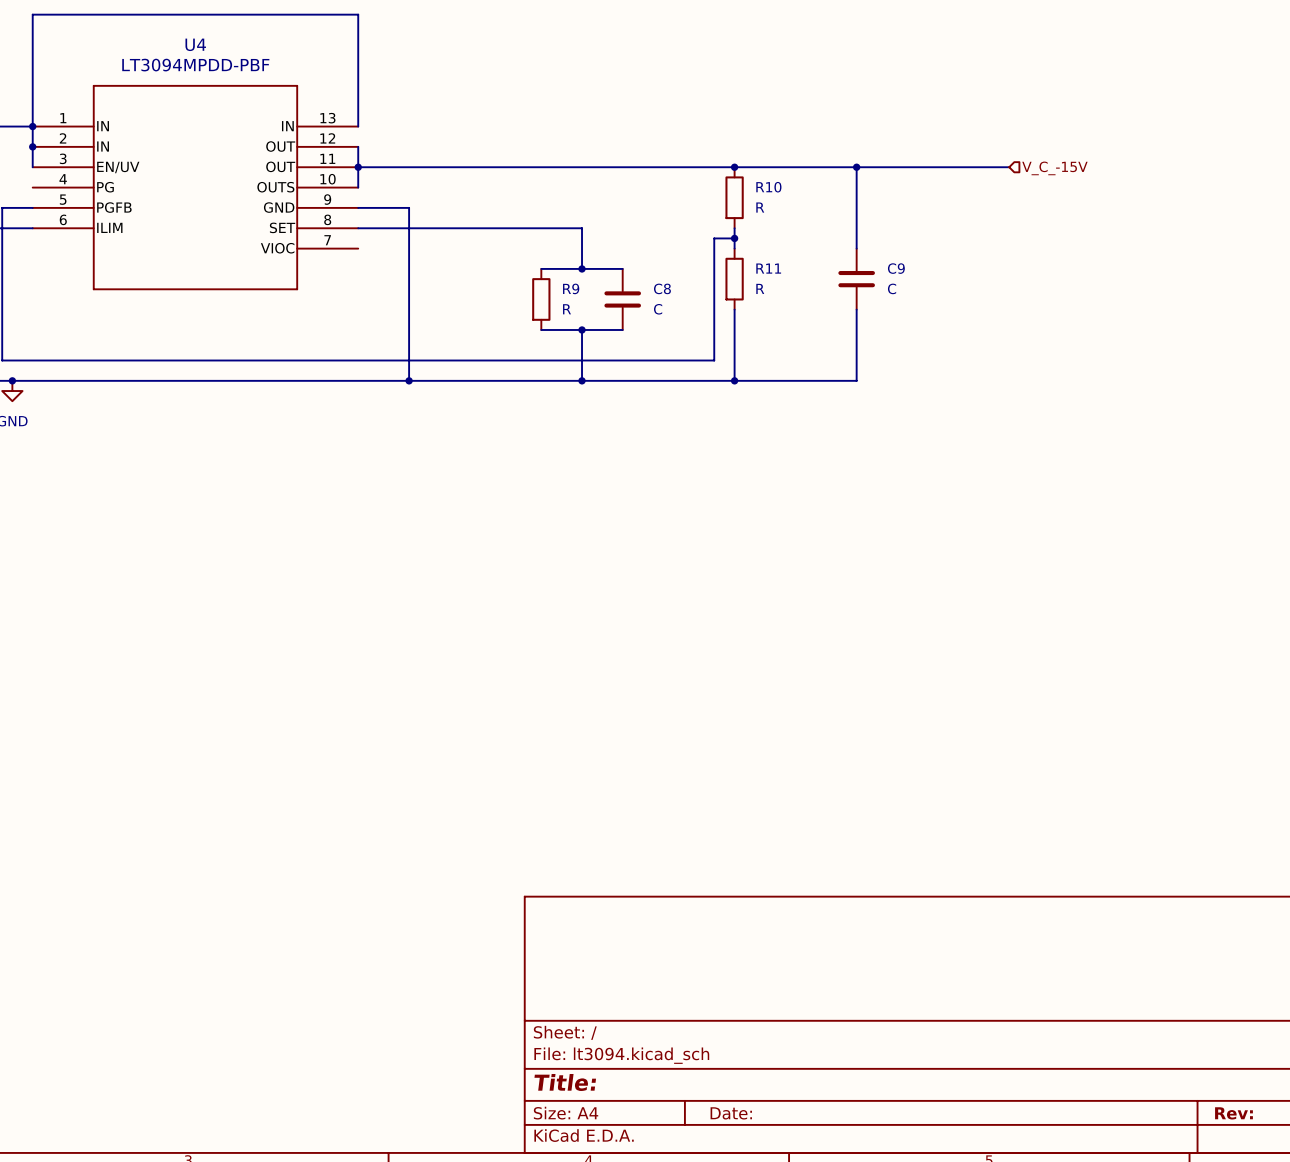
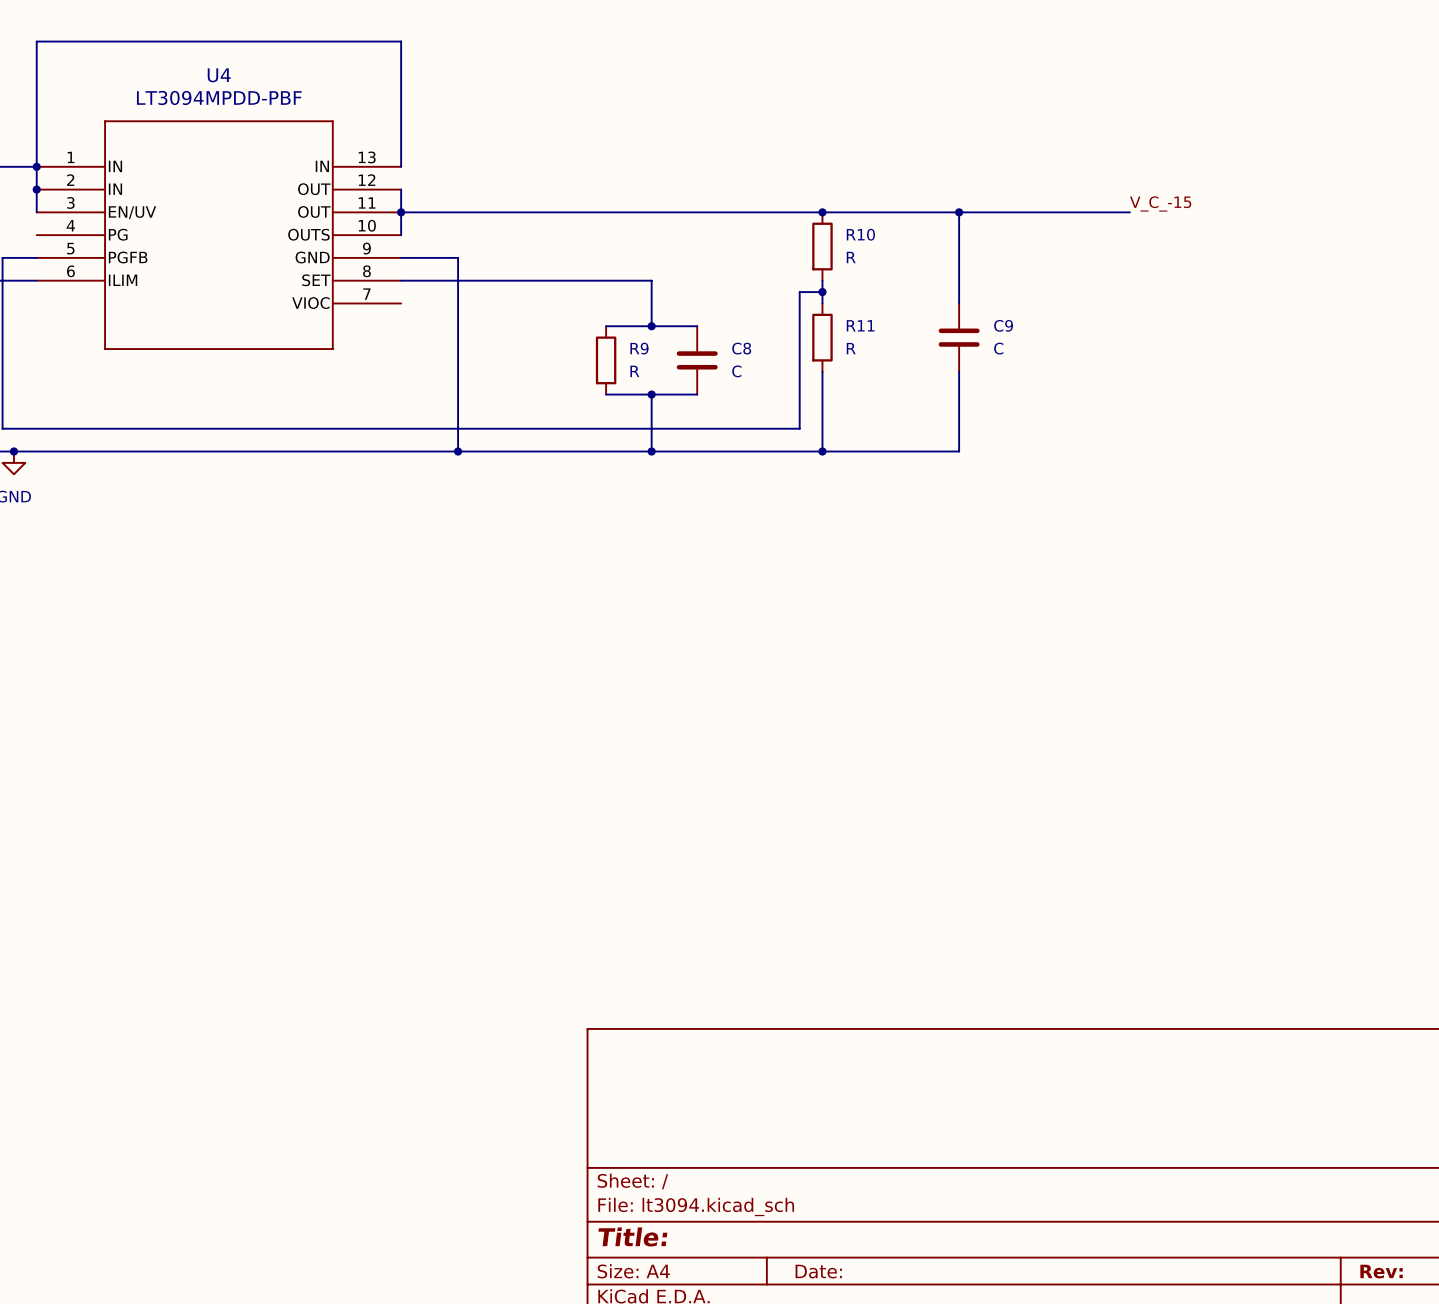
label: none -> V_C_-15 (1160, 203)
hierarchical label: V_C_-15V (1054, 168) -> none

